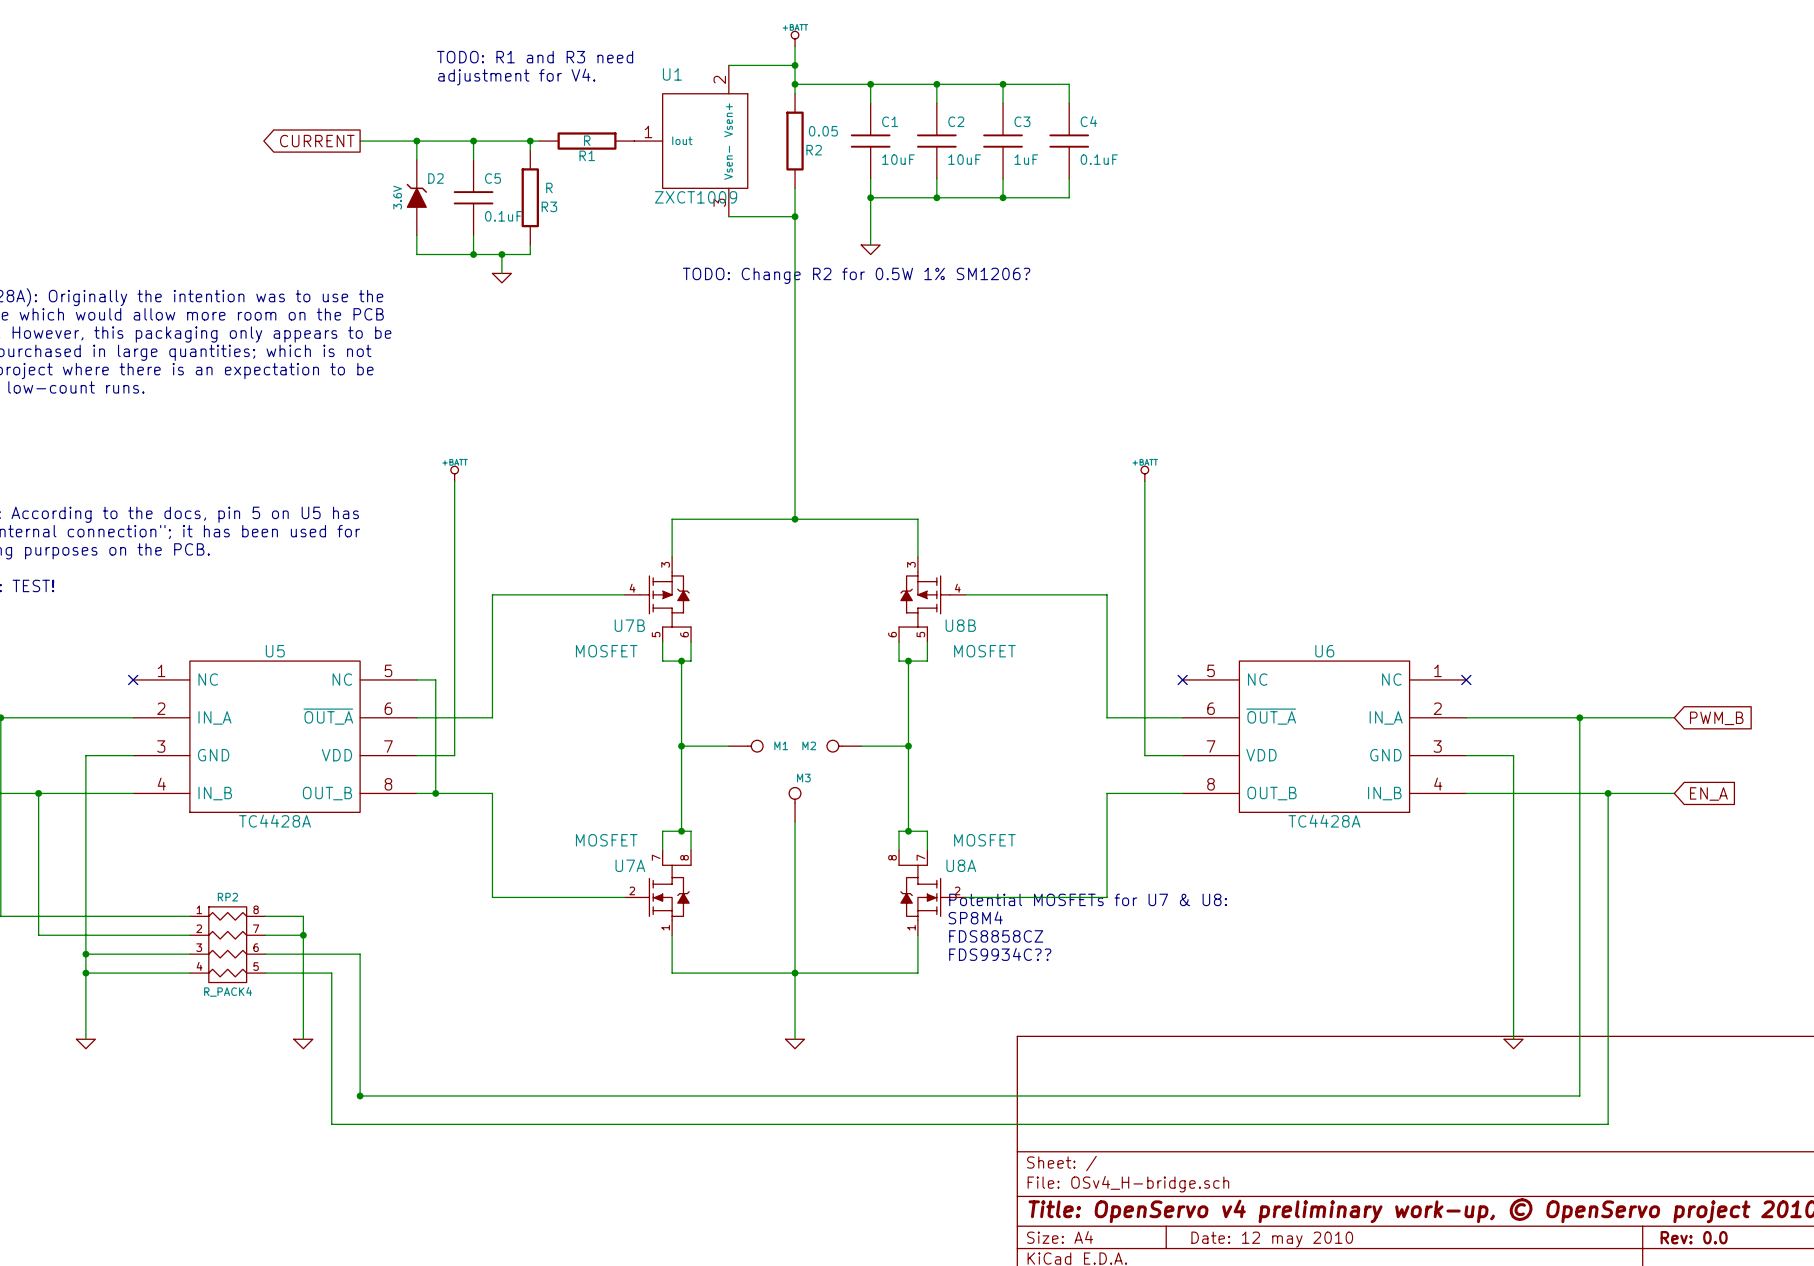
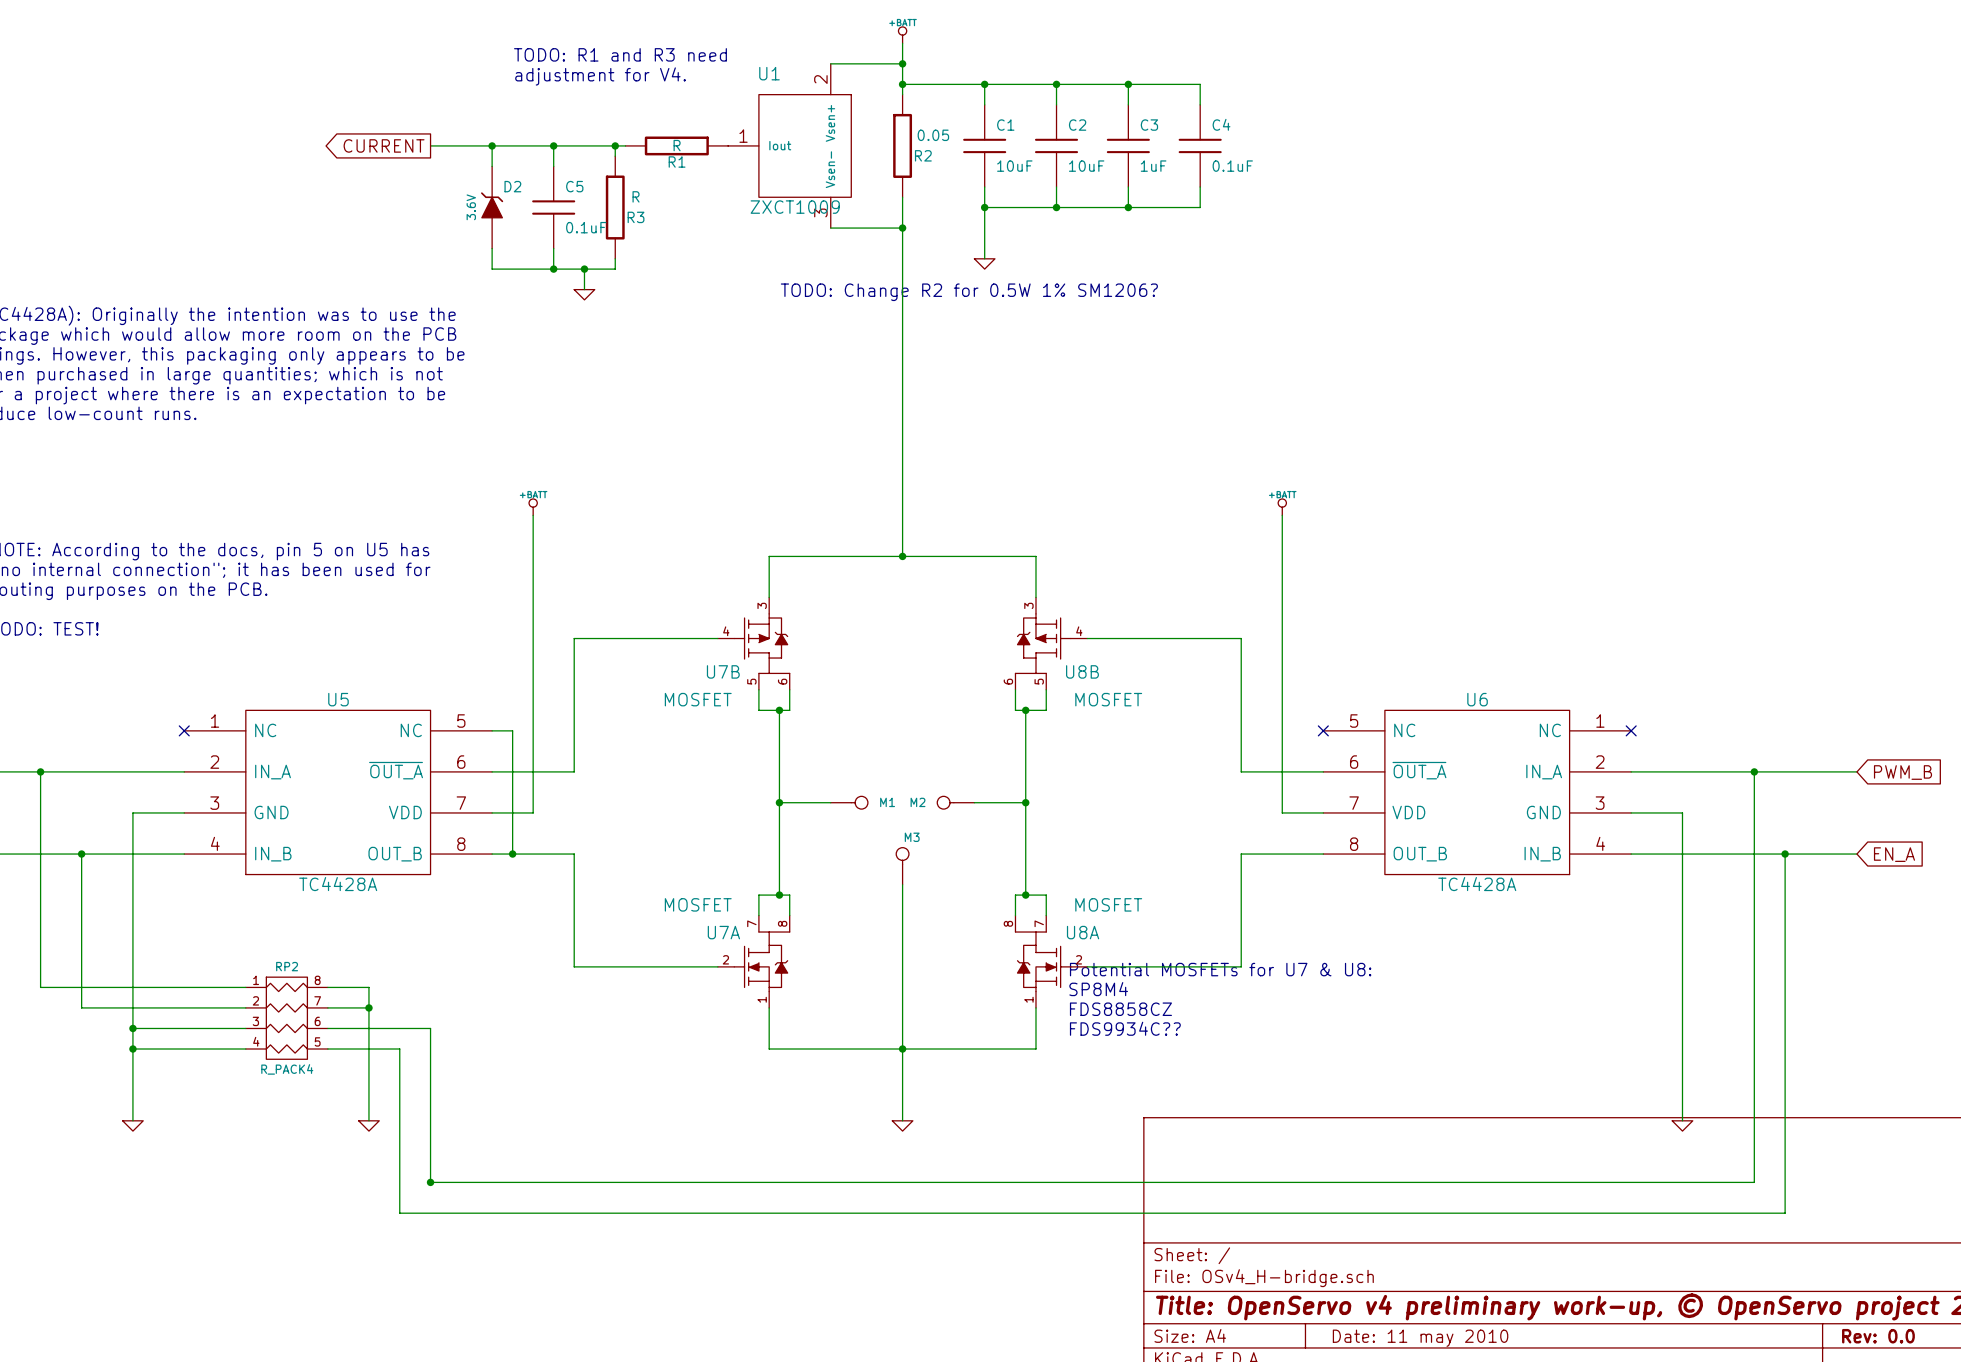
title block: Date: 12 may 2010 (1272, 1239) -> Date: 11 may 2010 (1420, 1338)

